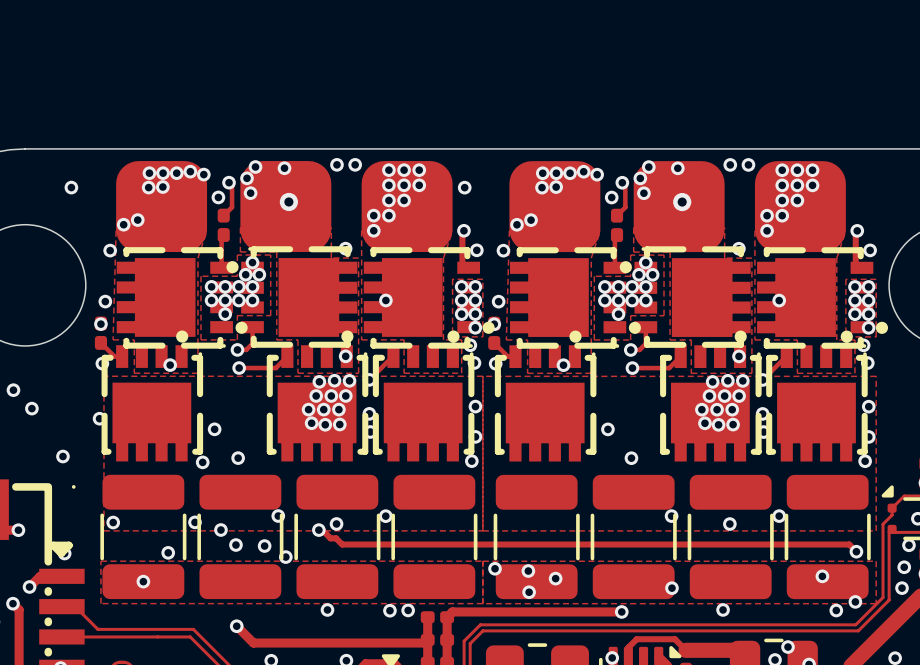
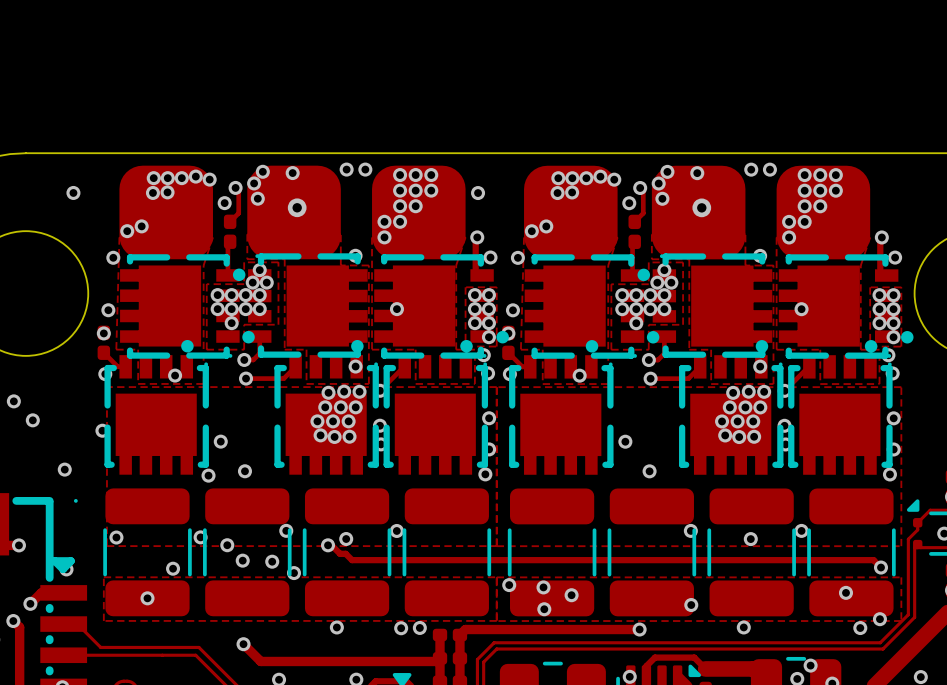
via: (908, 545) -> none
via: (904, 567) -> none
via: (902, 588) -> none

